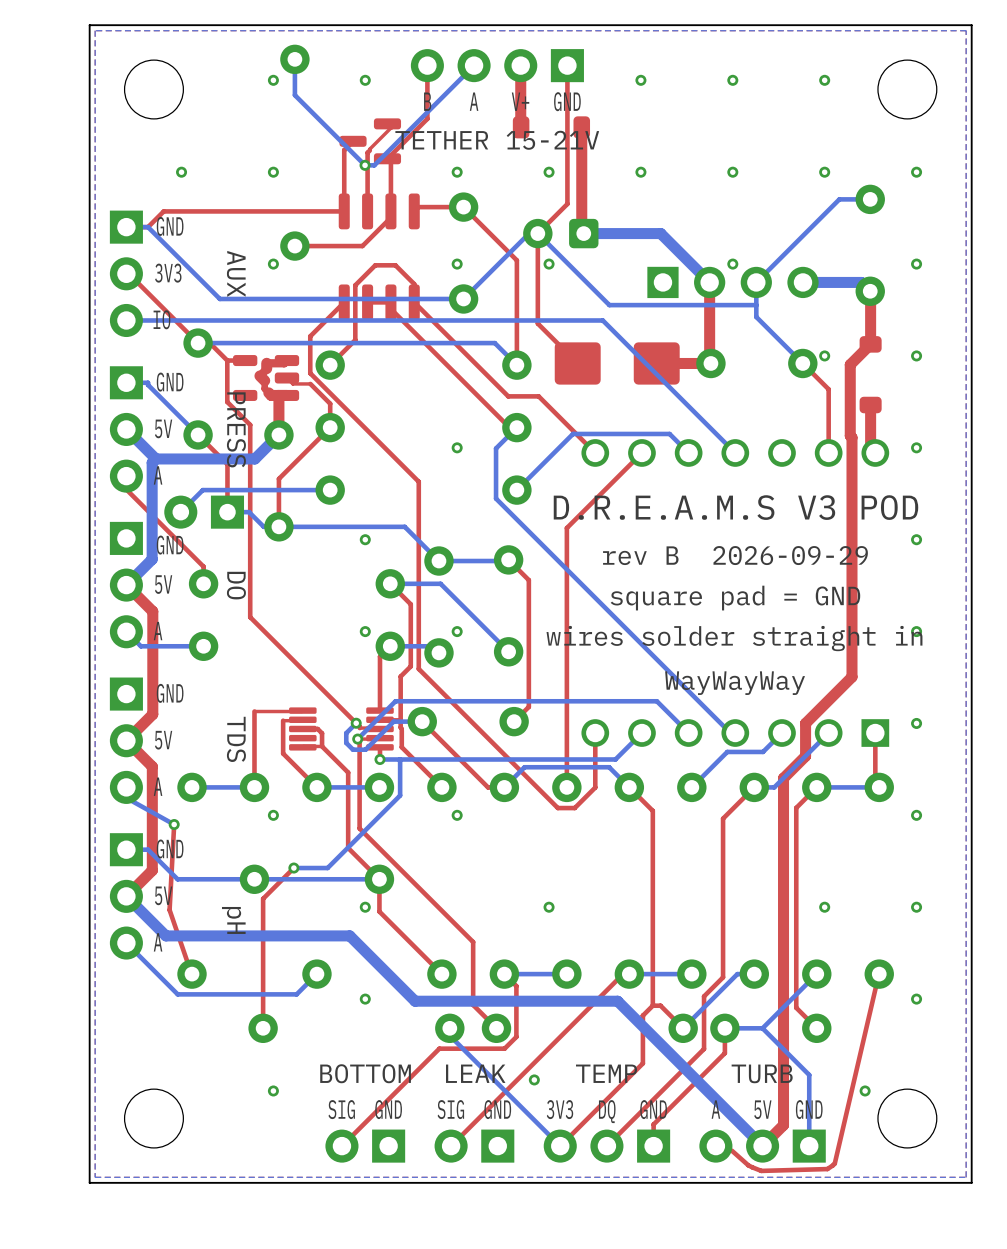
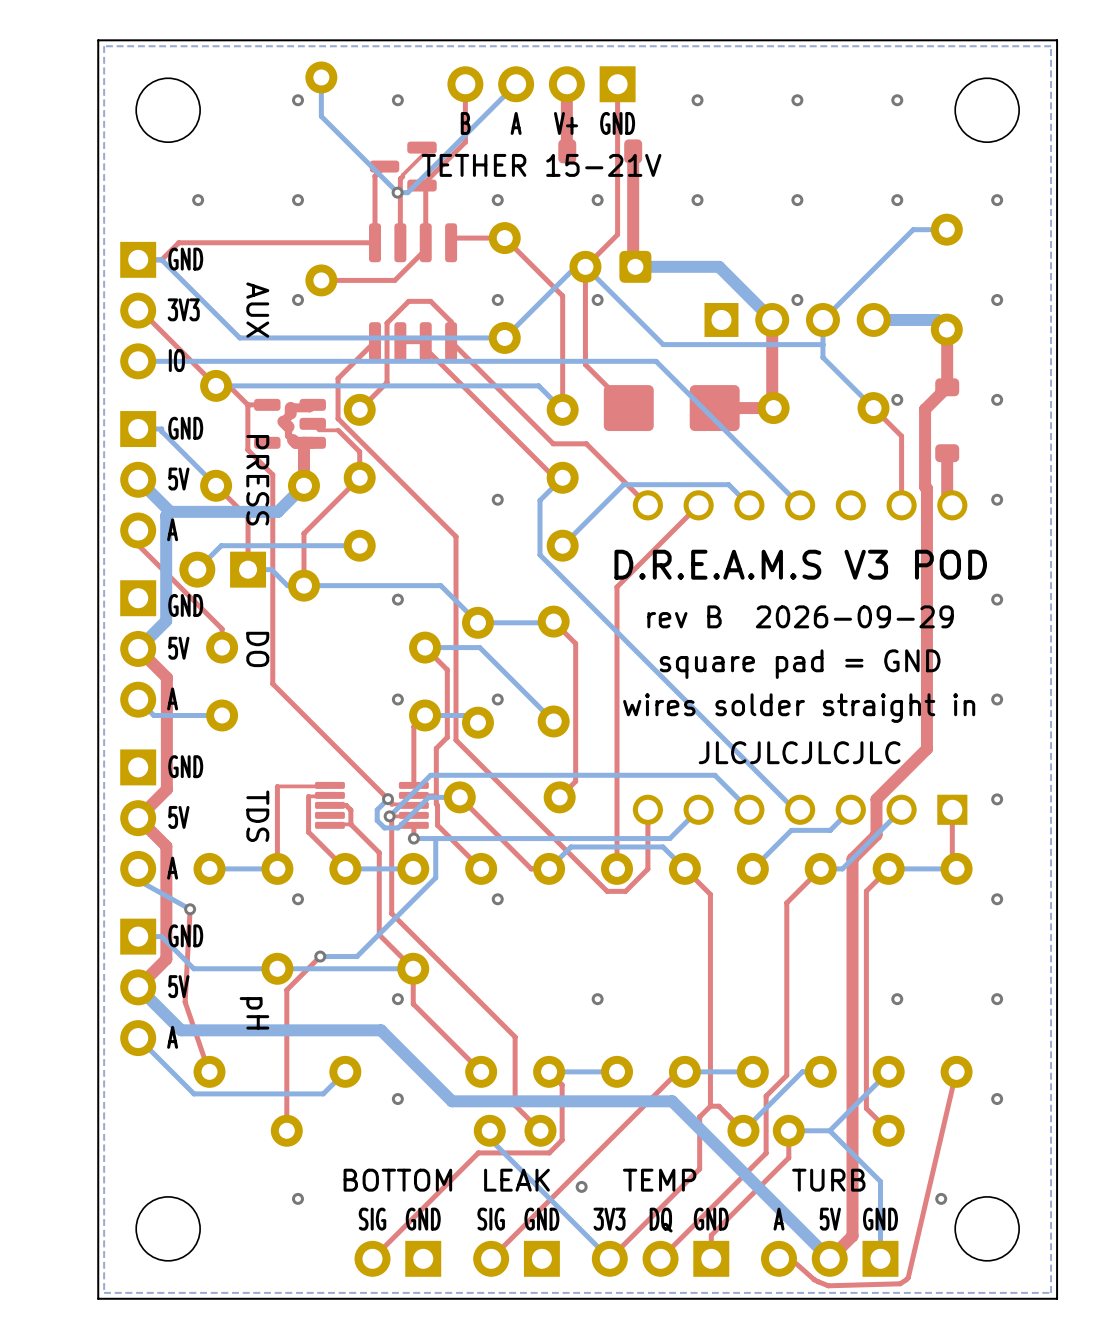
text: WayWayWay (735, 683) -> JLCJLCJLCJLC (799, 752)

